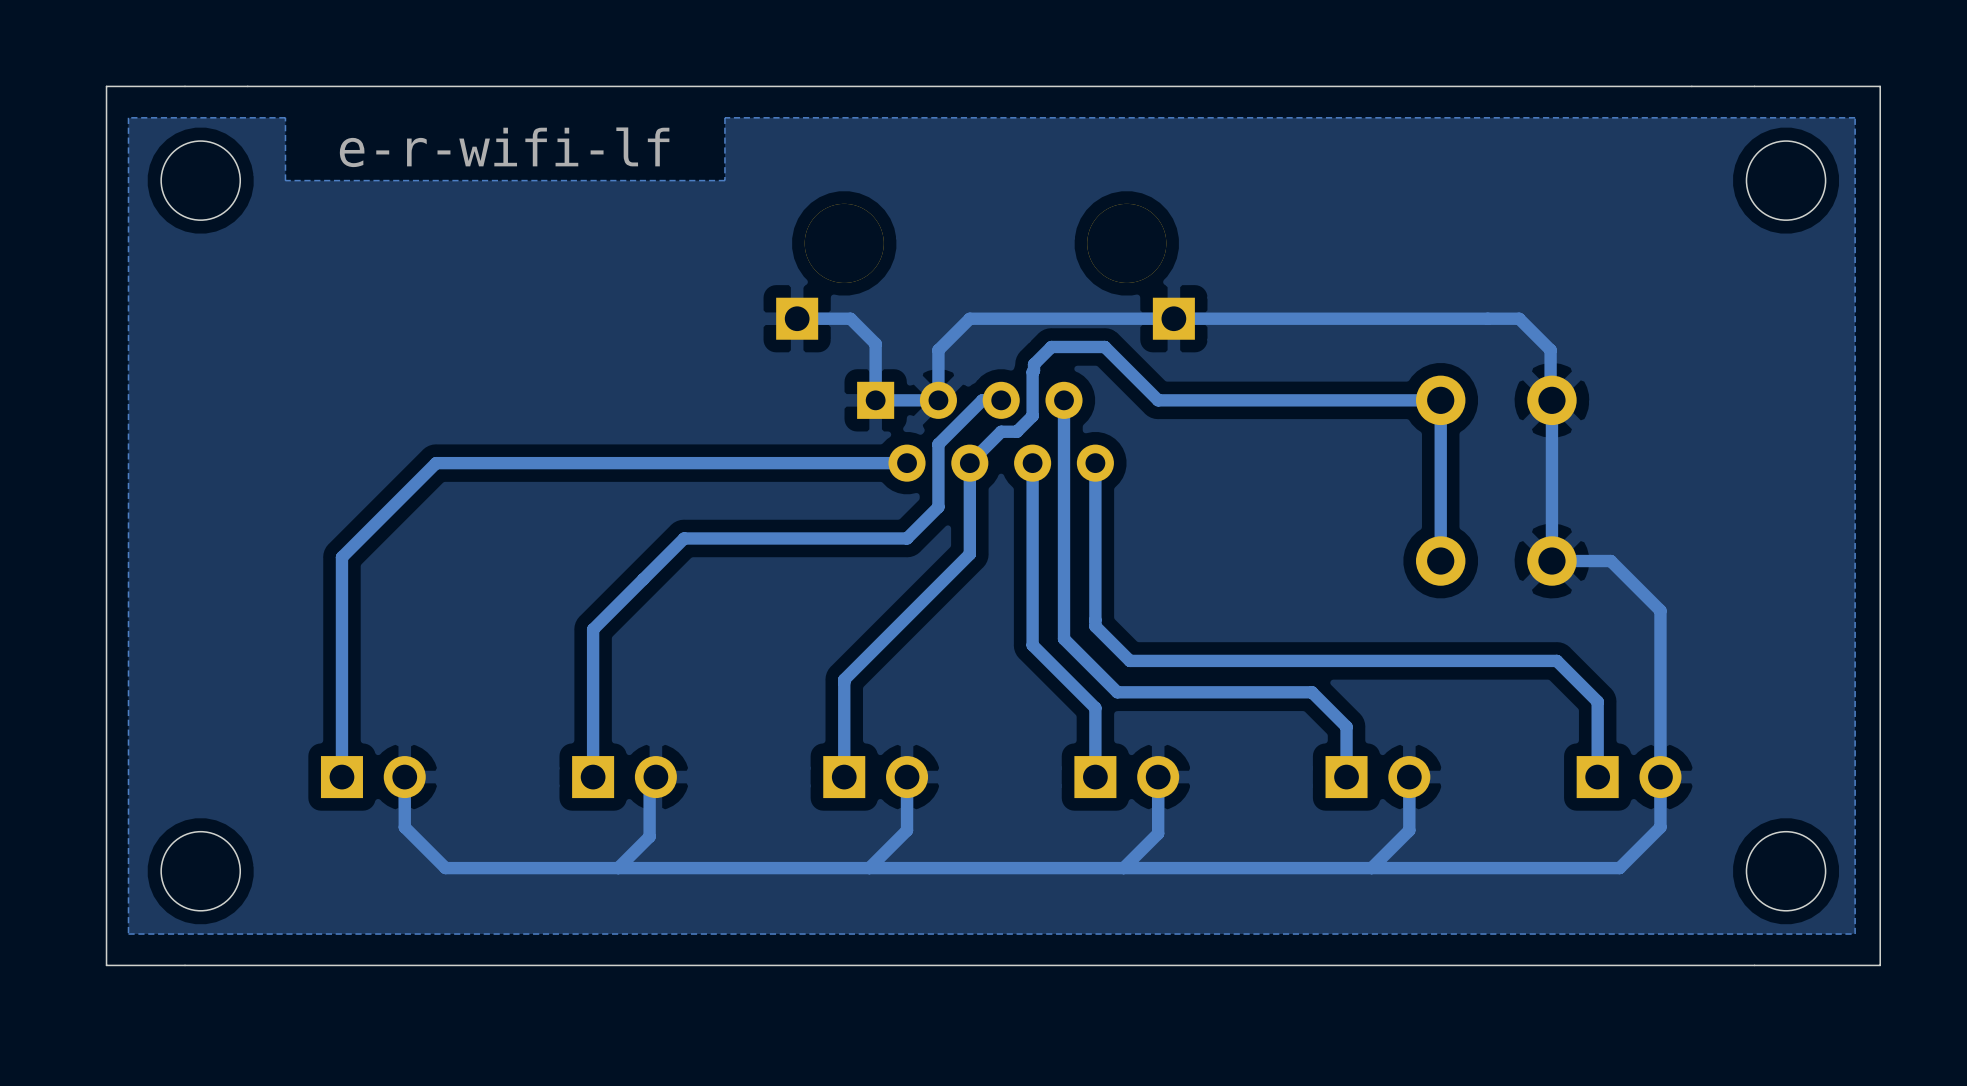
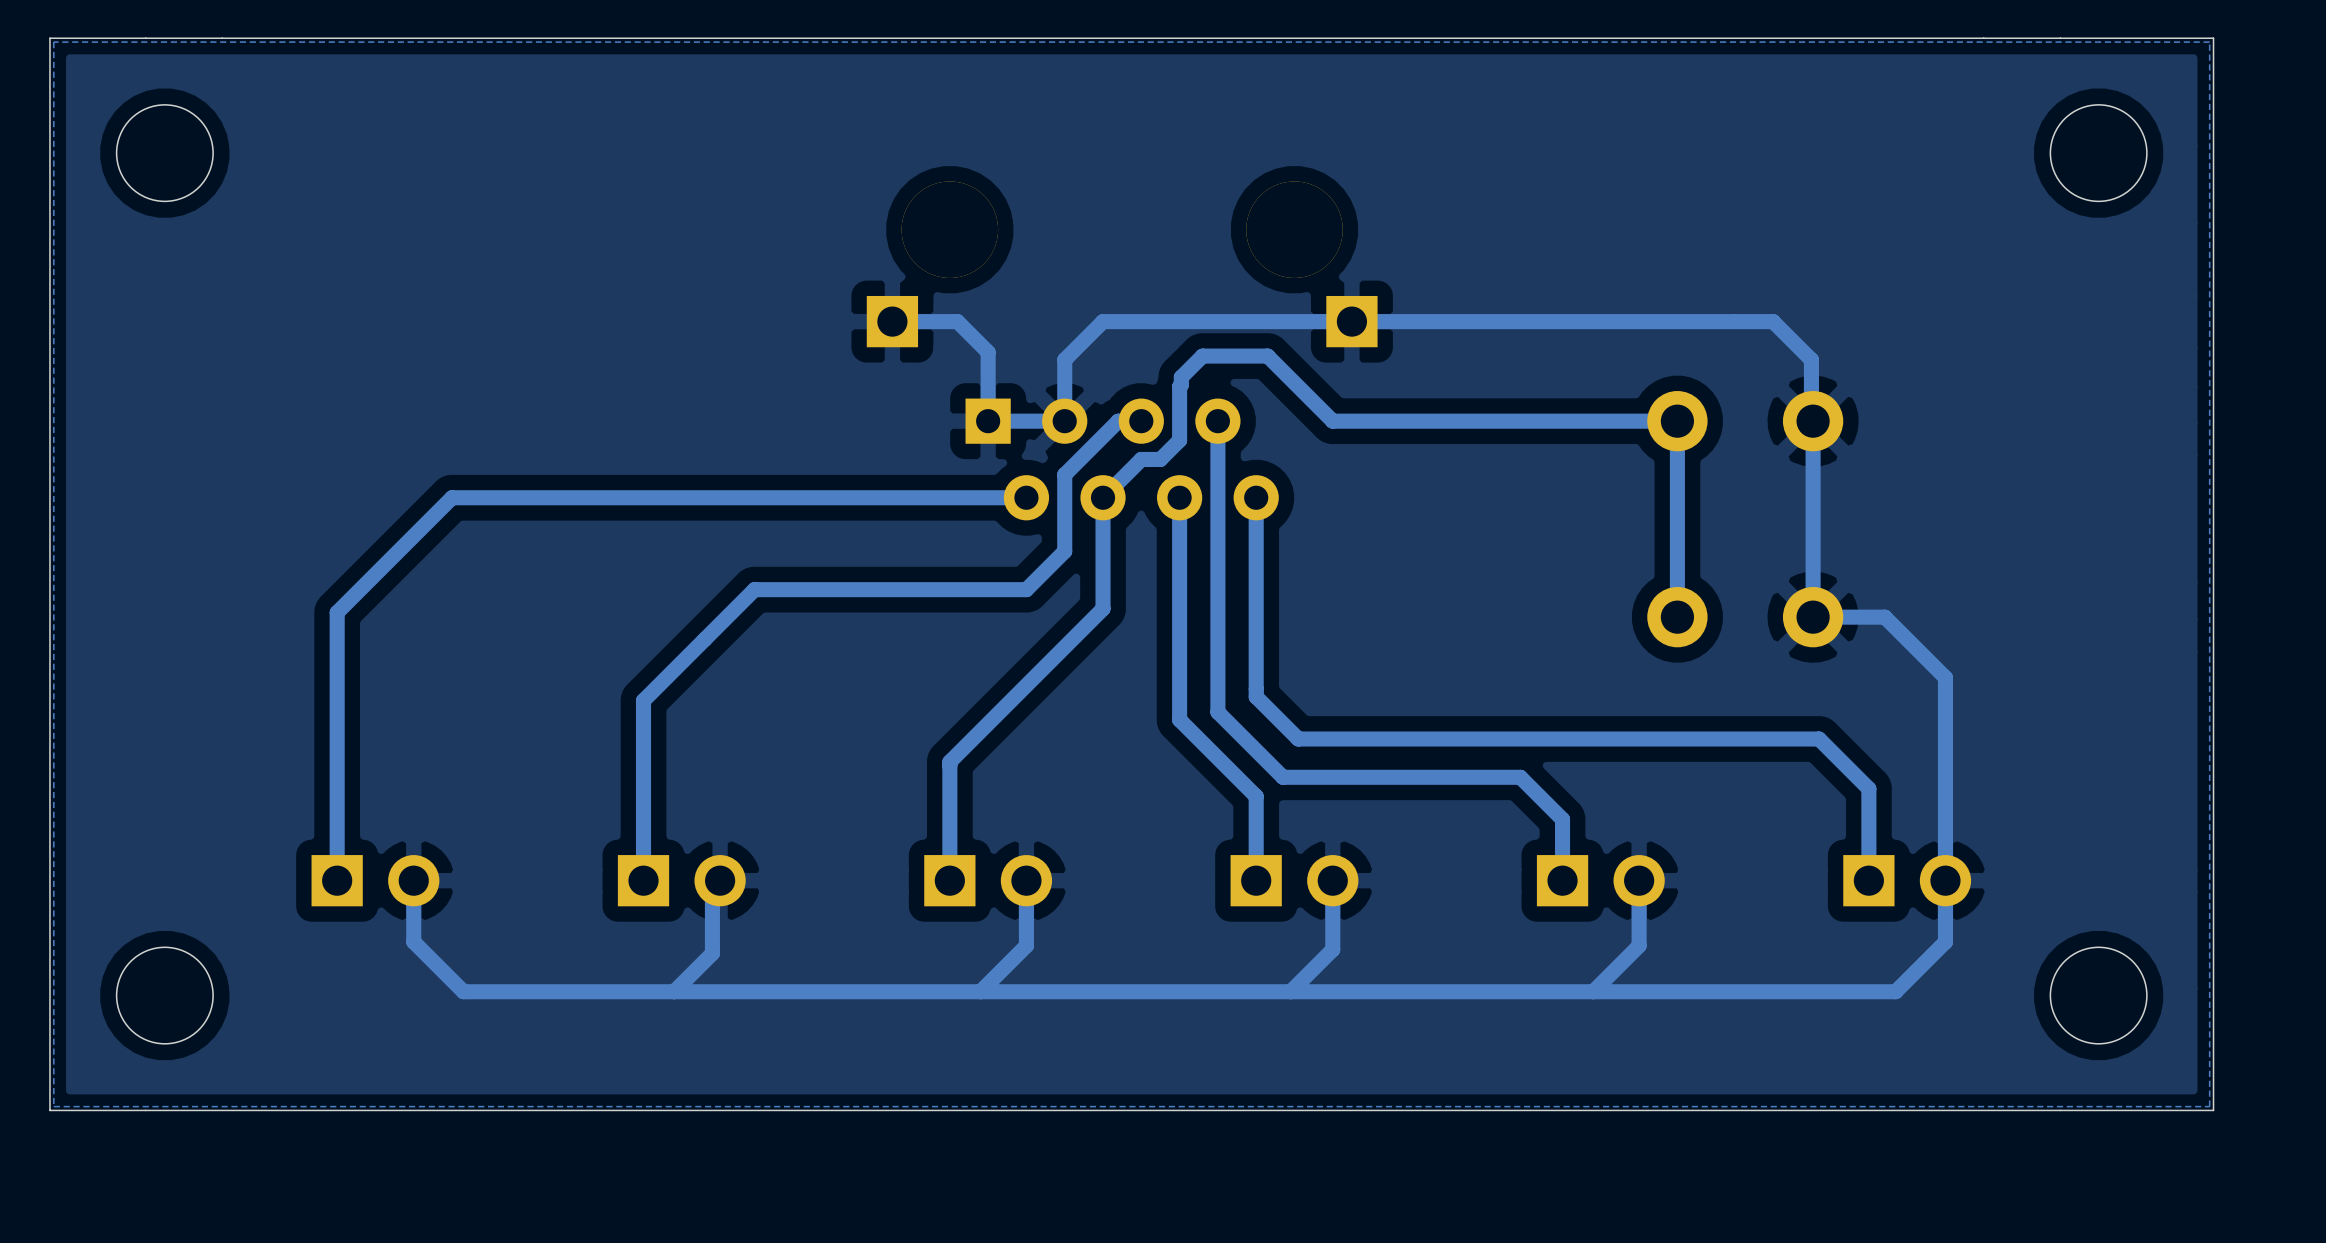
bottom zone outline: (1855, 117) (724, 117) (724, 180) (285, 180) (285, 117) (128, 117) (128, 934) (1855, 934) (1855, 117) -> (2209, 42) (2209, 1106) (53, 1106) (53, 42) (2209, 42)
text: e-r-wifi-lf (504, 147) -> none

